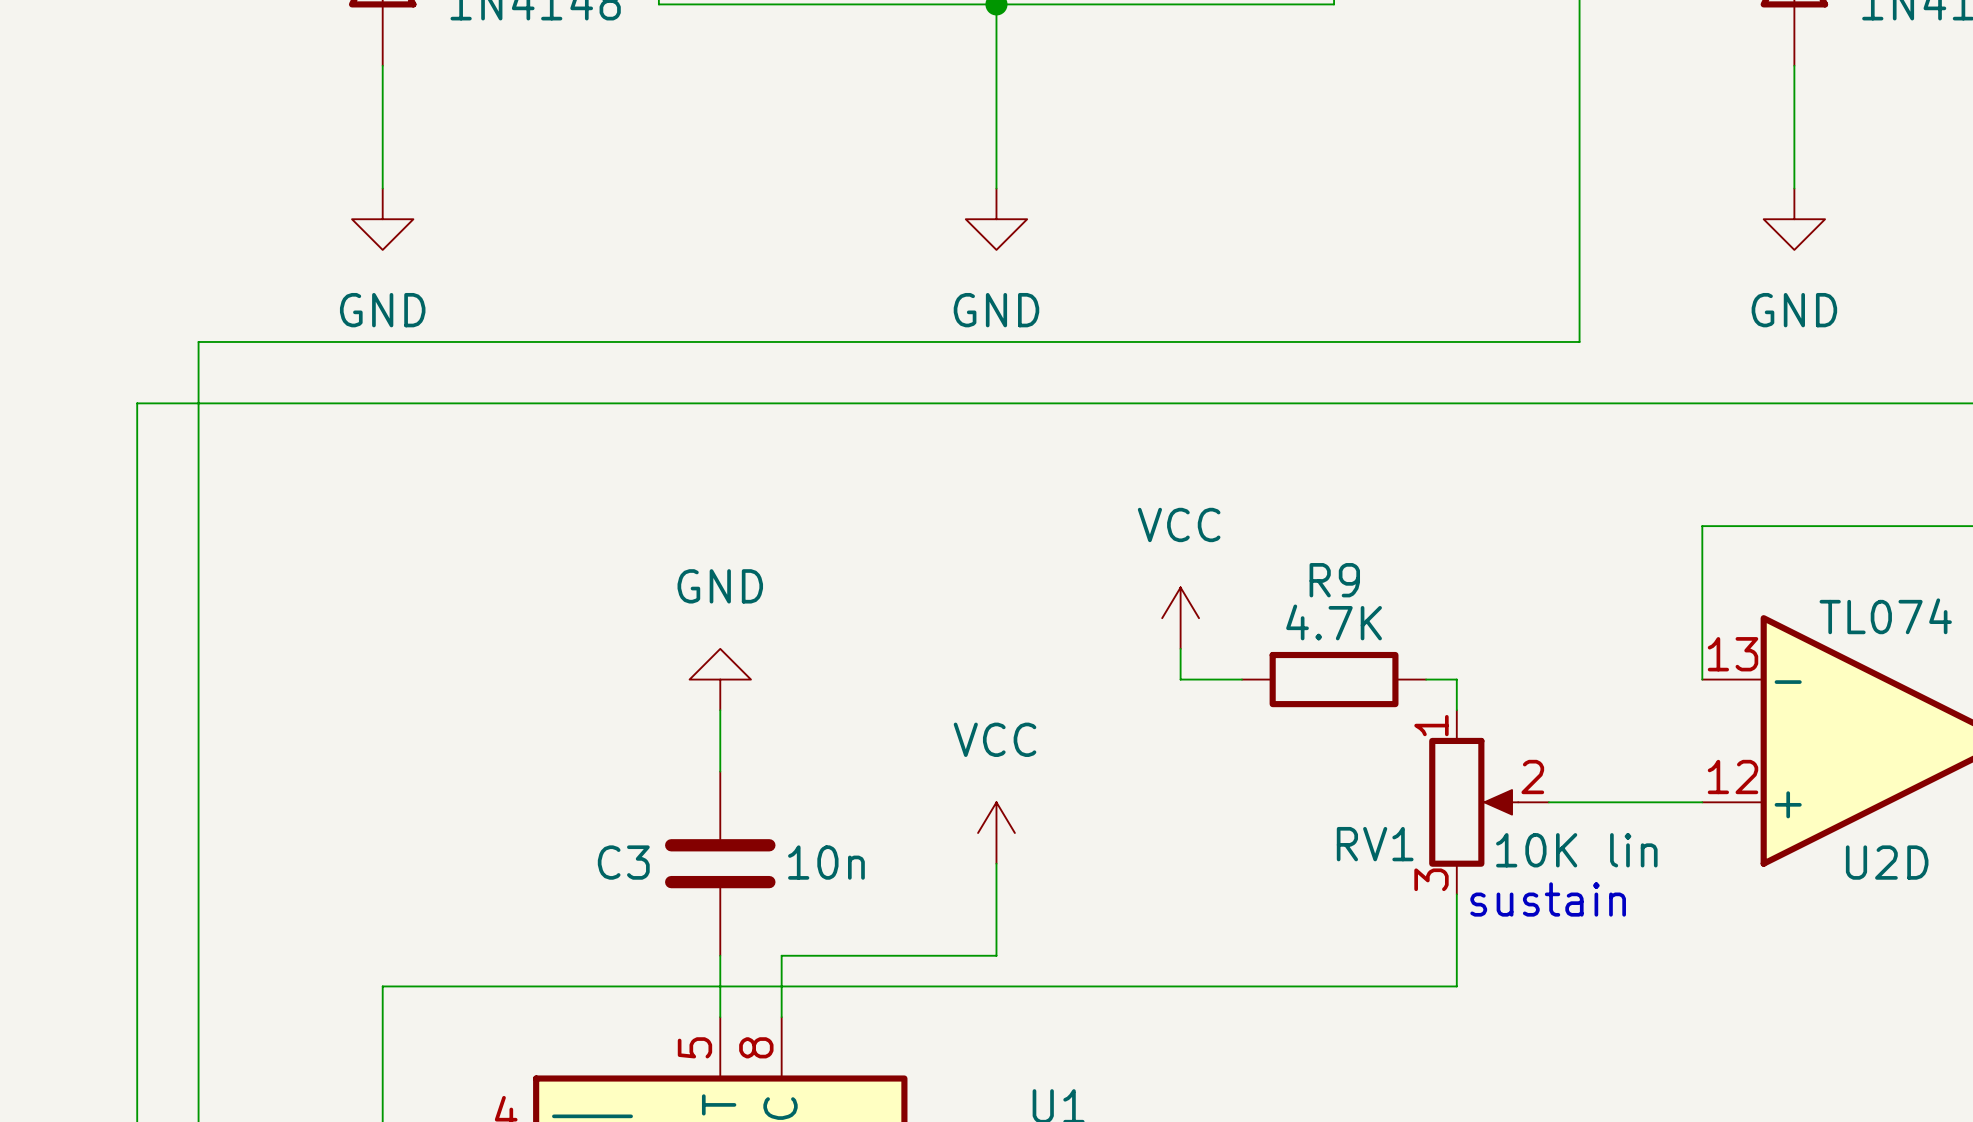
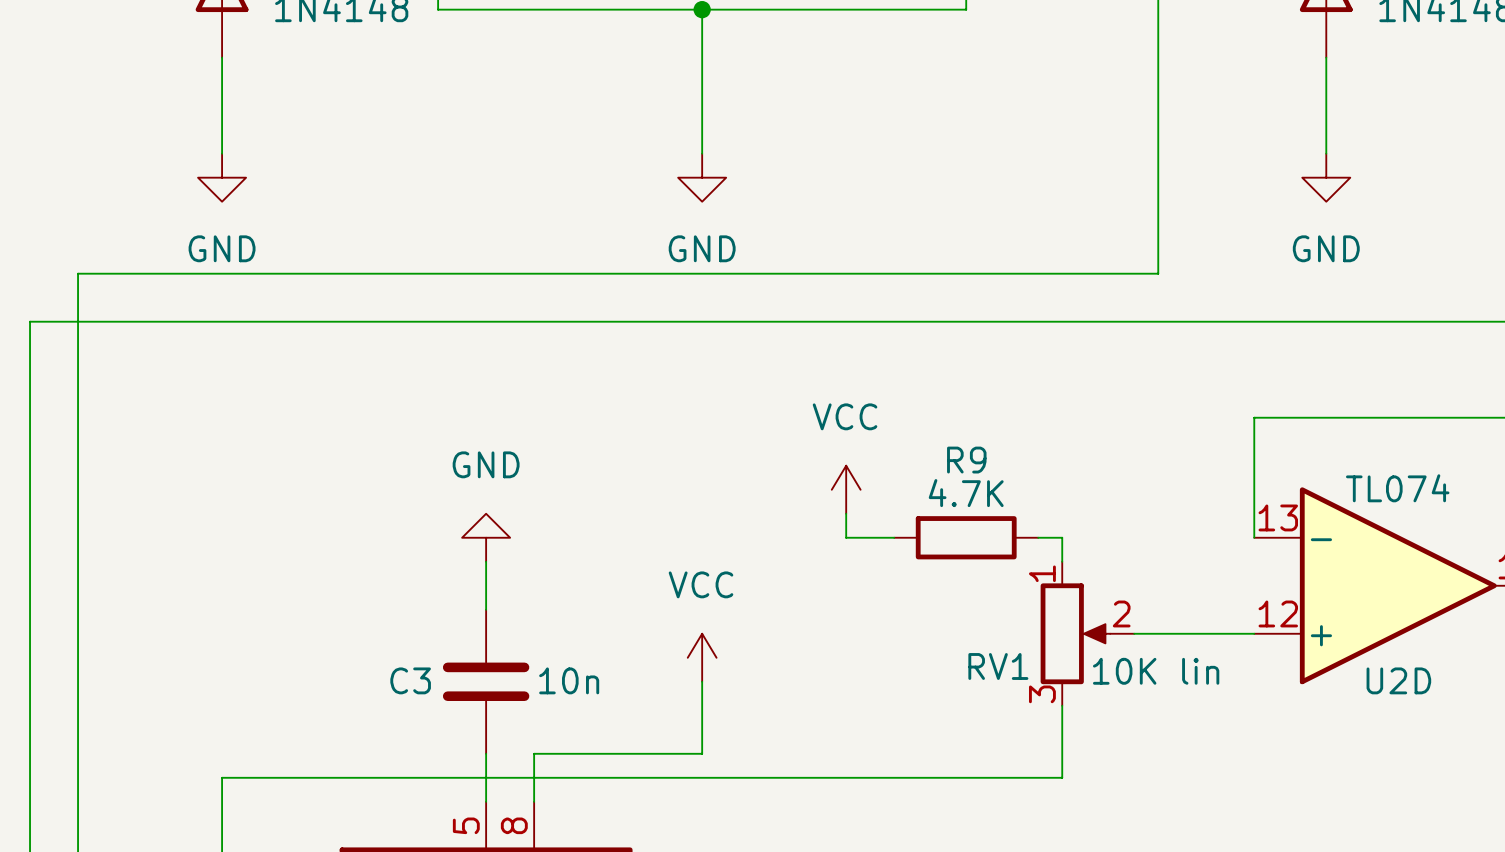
text: sustain (1548, 899) -> none

